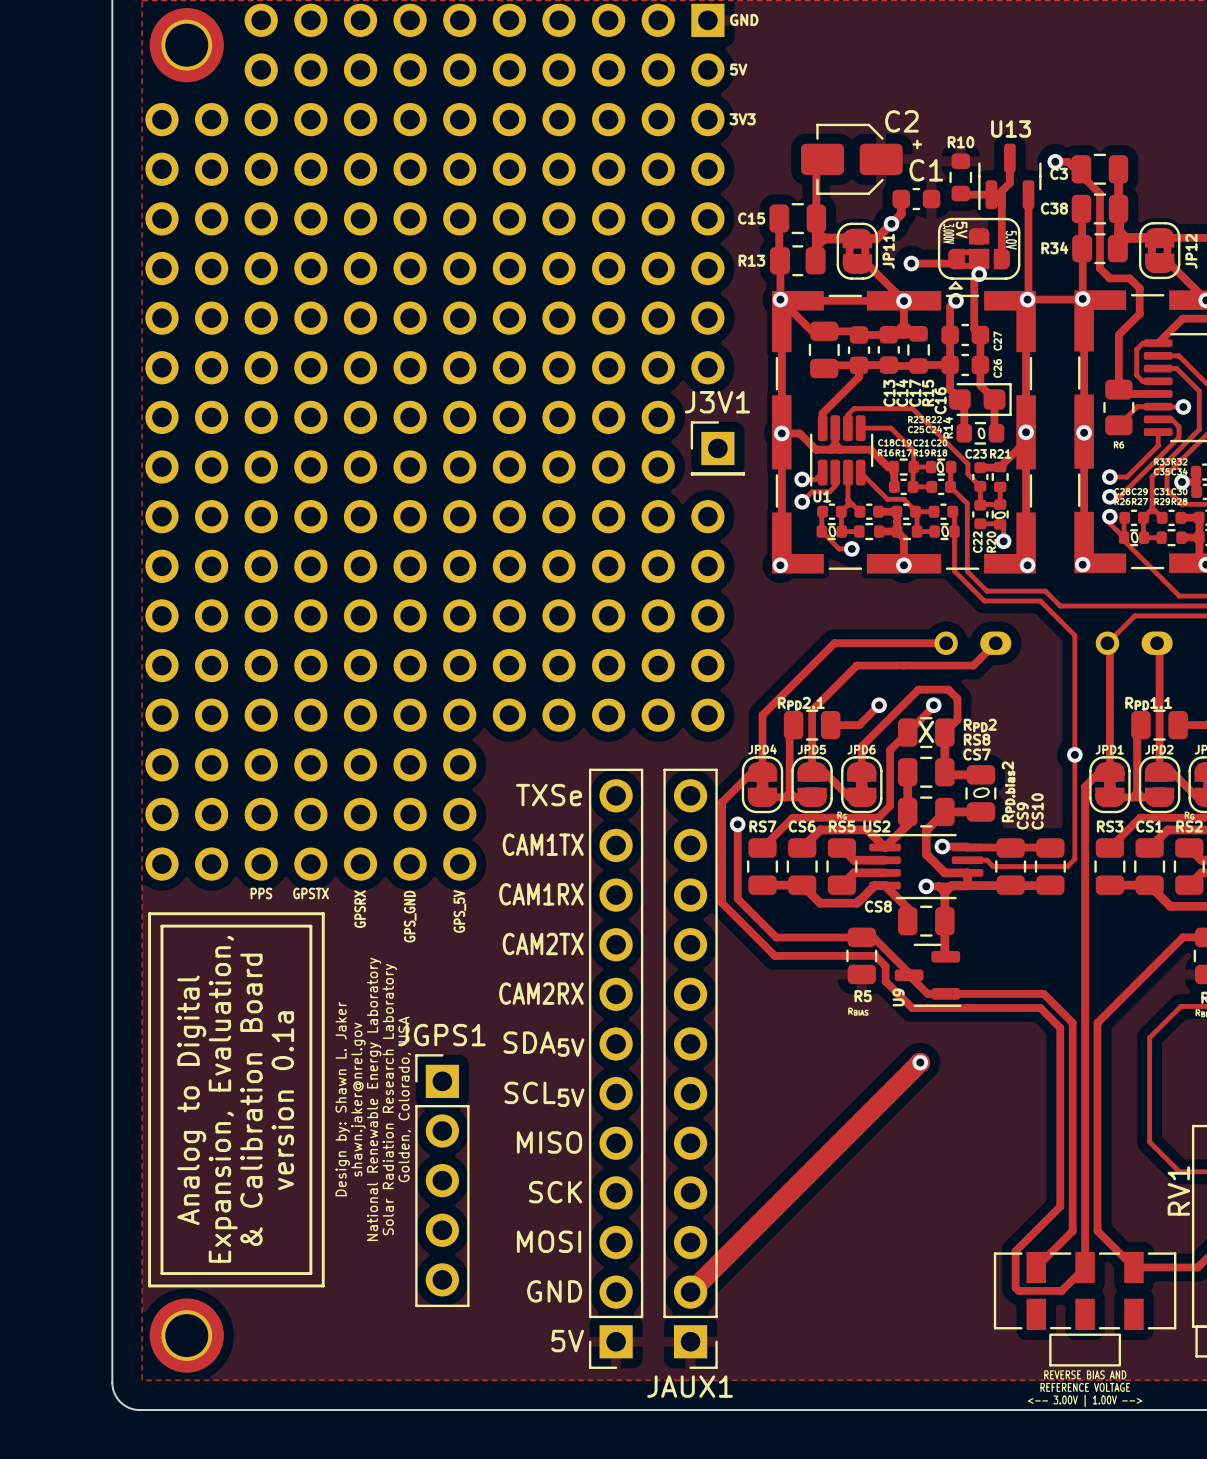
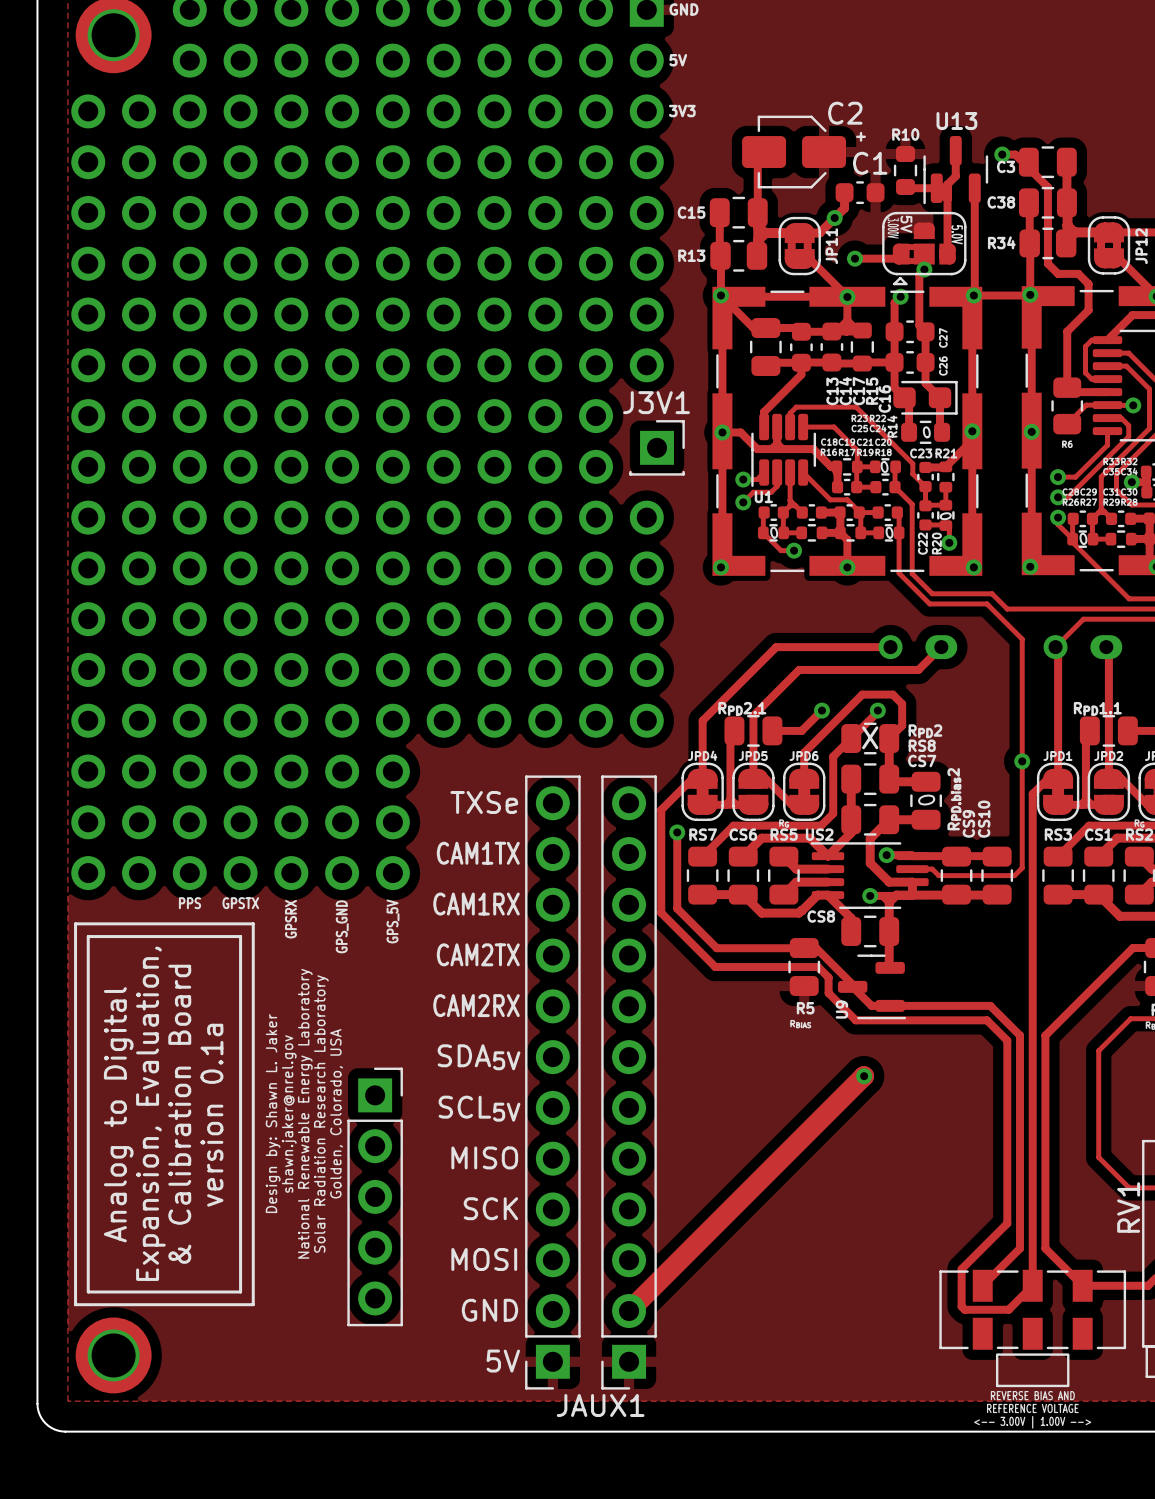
J3V1 footprint: [690, 421, 746, 476] -> [629, 420, 685, 476]
JAUX1 footprint: [663, 768, 718, 1369] -> [601, 775, 657, 1390]
JGPS1: (442, 1180) -> none
part: none -> (375, 1196)

